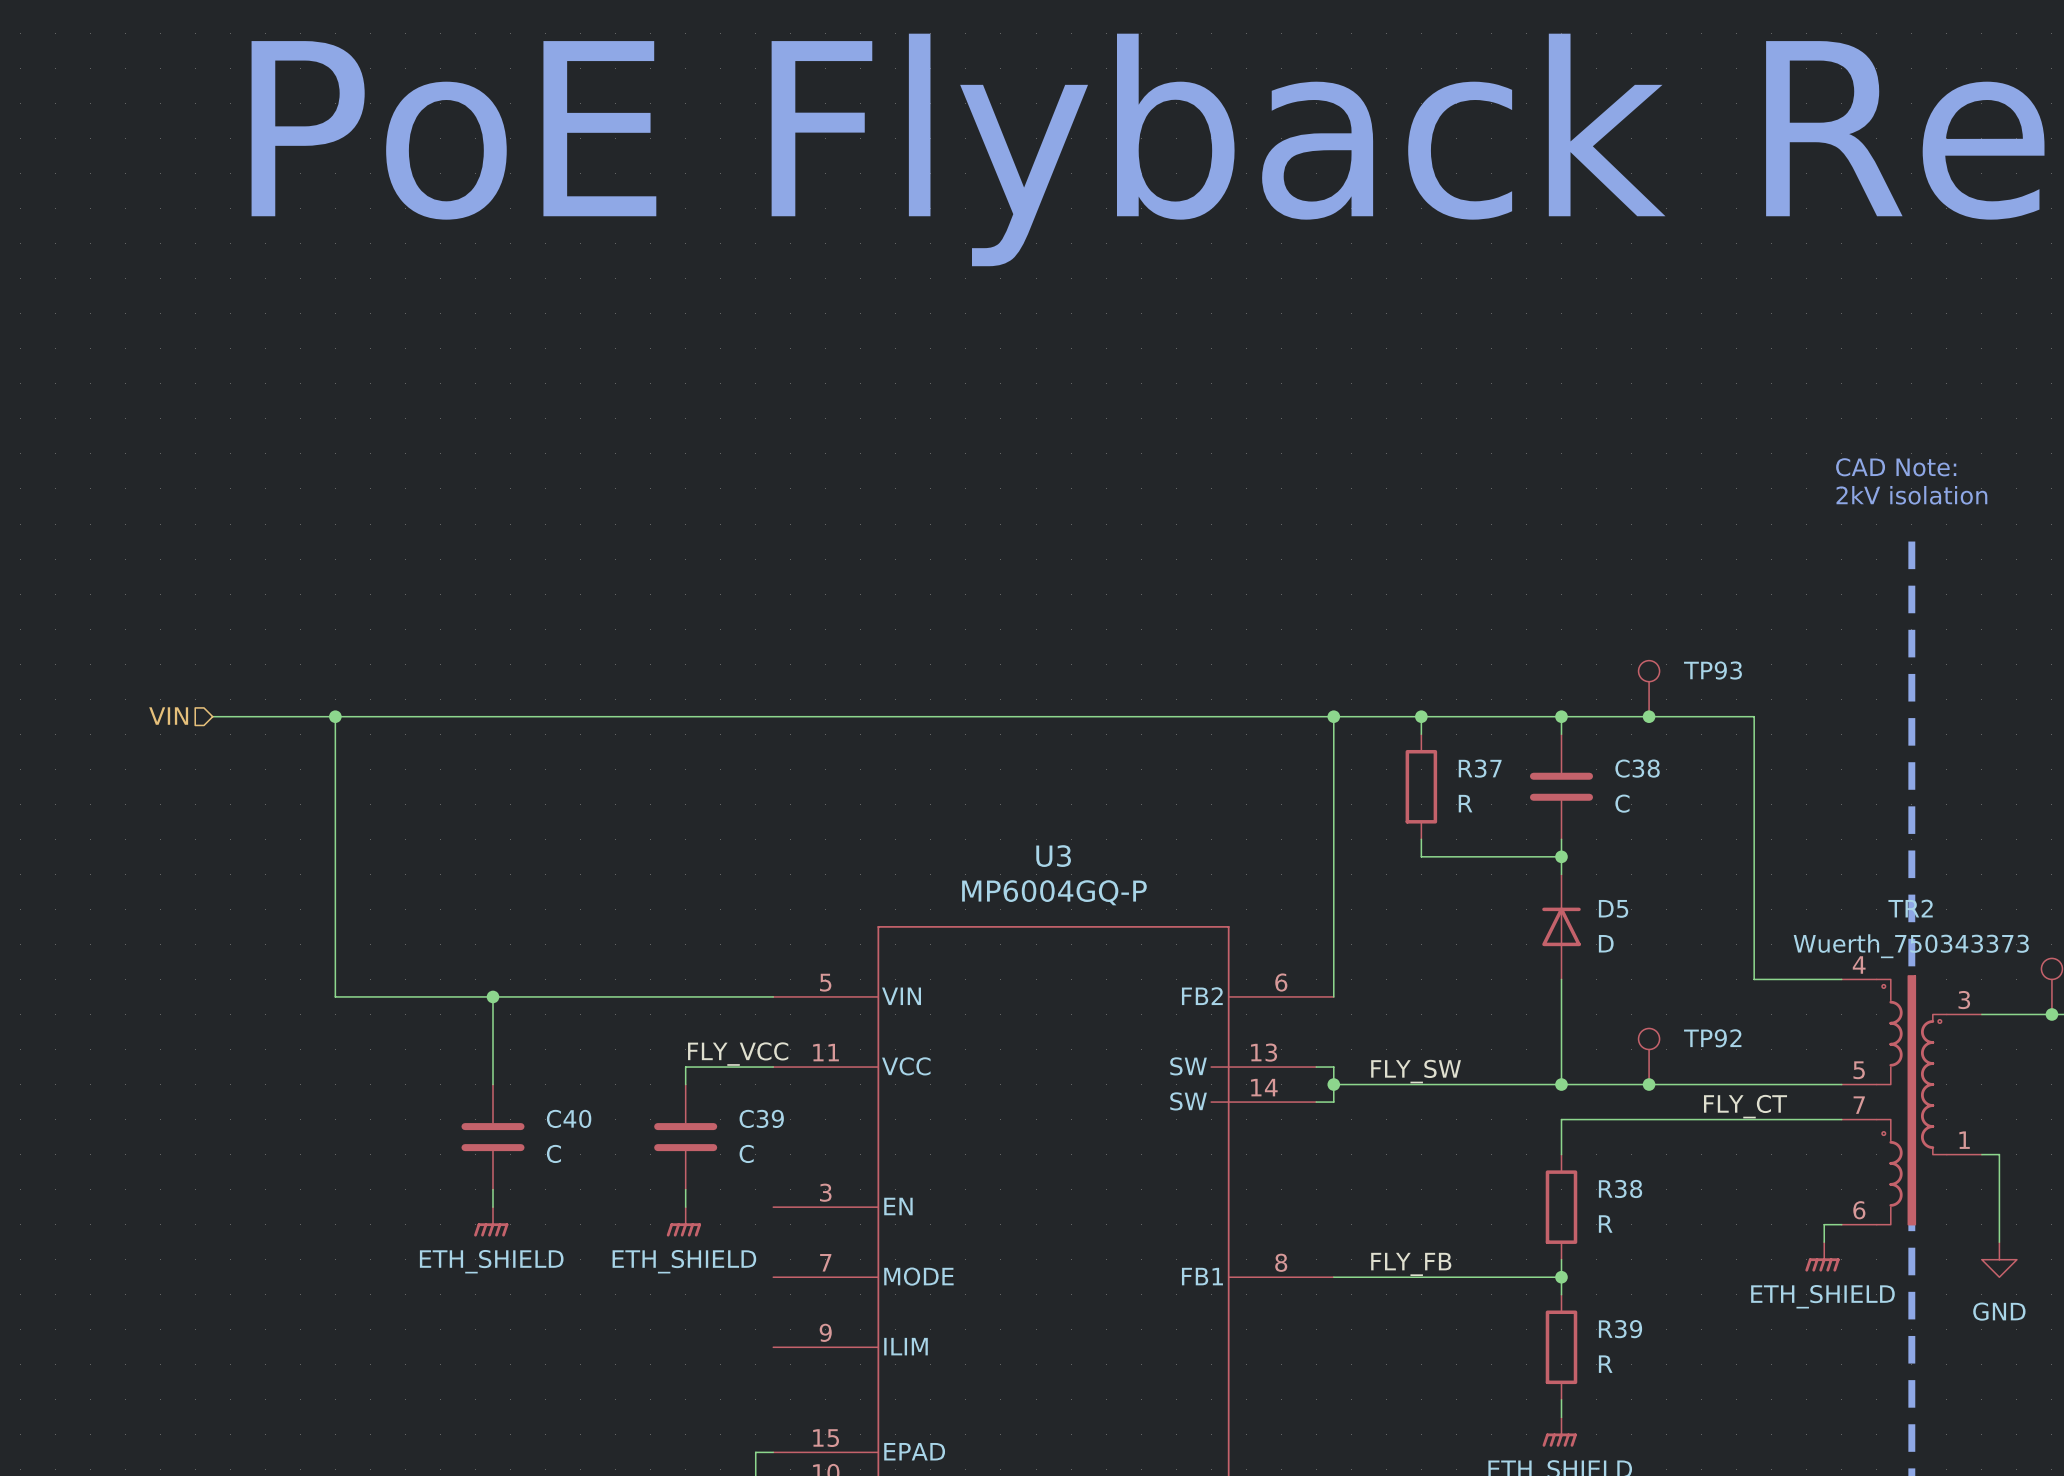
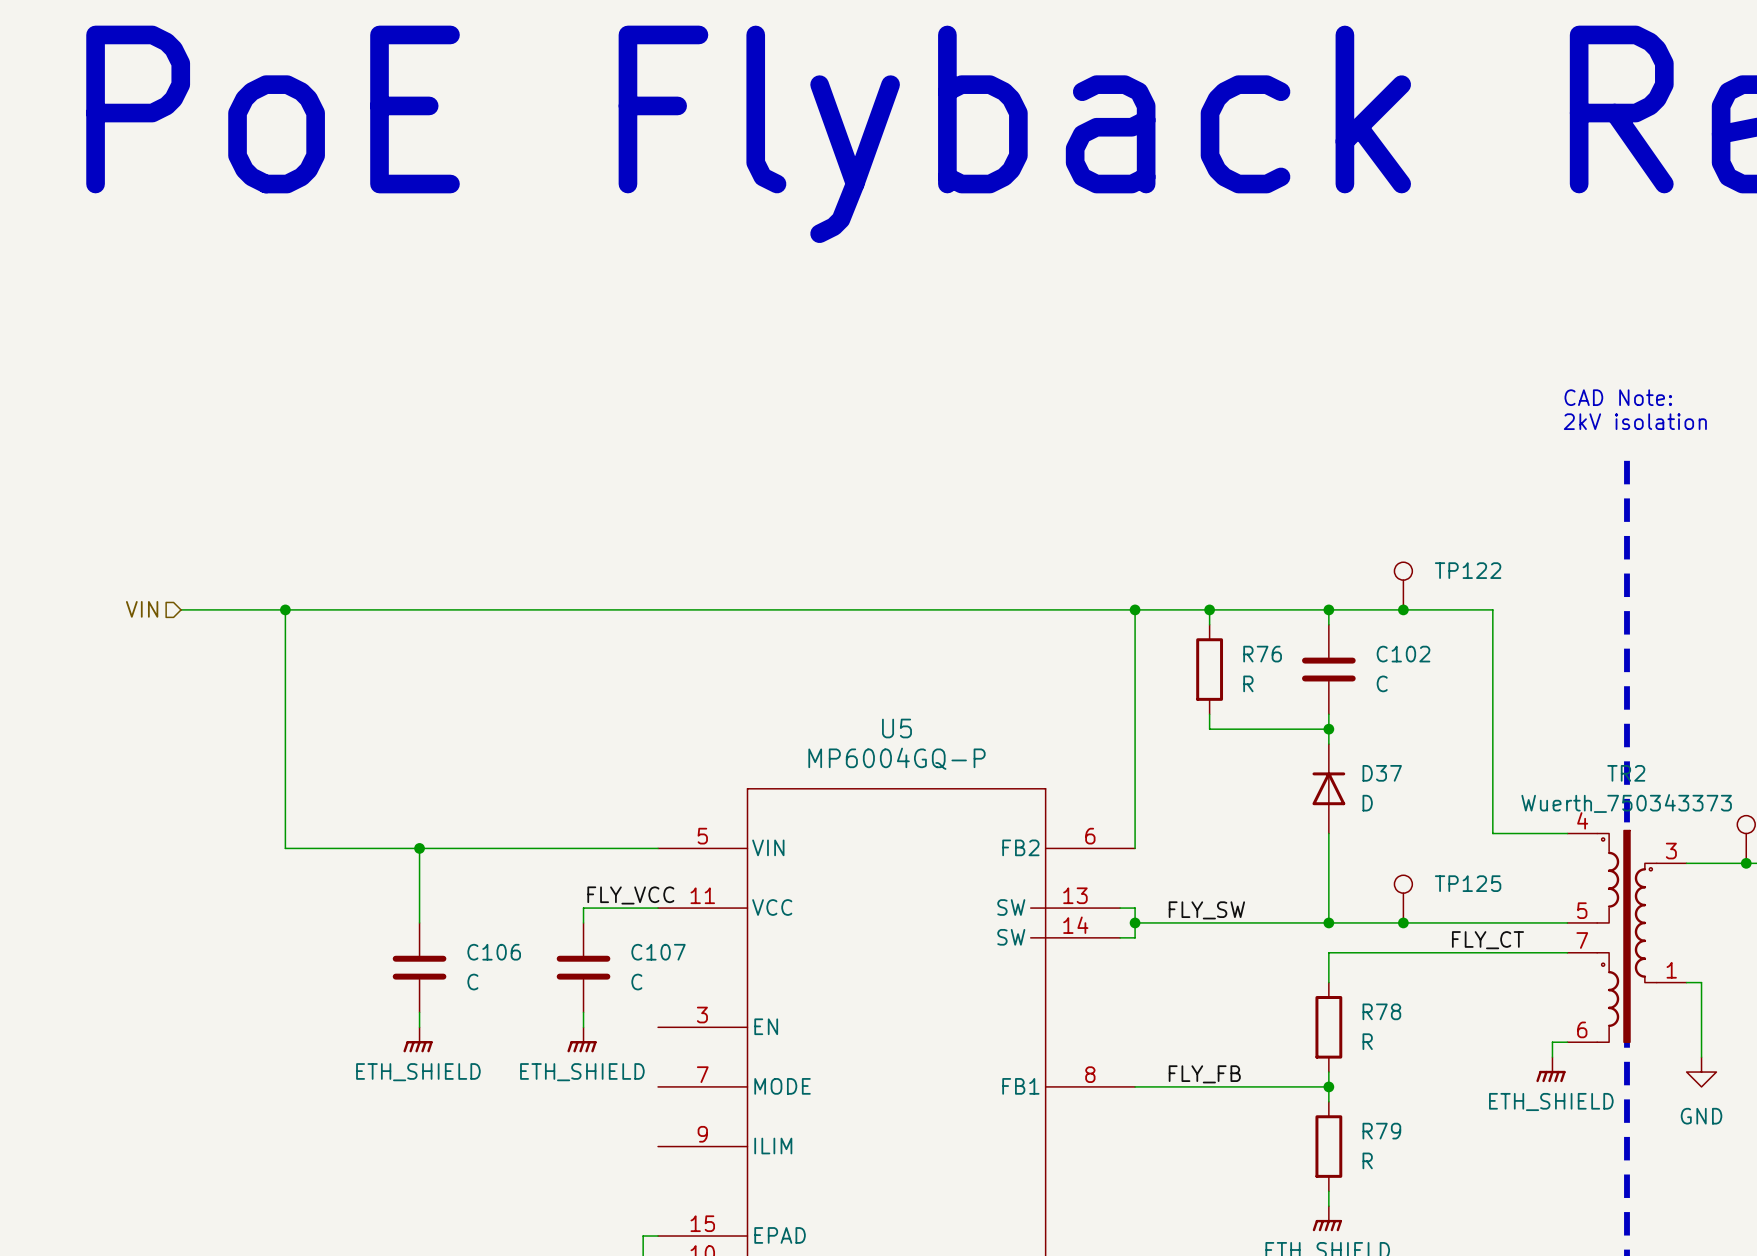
TP93 name: TP93 (1712, 670) -> TP122 (1468, 570)
R37 name: R37 (1480, 768) -> R76 (1262, 654)
C38 name: C38 (1637, 768) -> C102 (1403, 654)
U3 name: U3 (1053, 856) -> U5 (896, 728)
D5 name: D5 (1613, 908) -> D37 (1382, 773)
TP92 name: TP92 (1712, 1038) -> TP125 (1468, 883)
C40 name: C40 (569, 1118) -> C106 (494, 952)
C39 name: C39 (761, 1118) -> C107 (658, 952)
R38 name: R38 (1620, 1188) -> R78 (1381, 1011)
R39 name: R39 (1620, 1329) -> R79 (1381, 1131)

